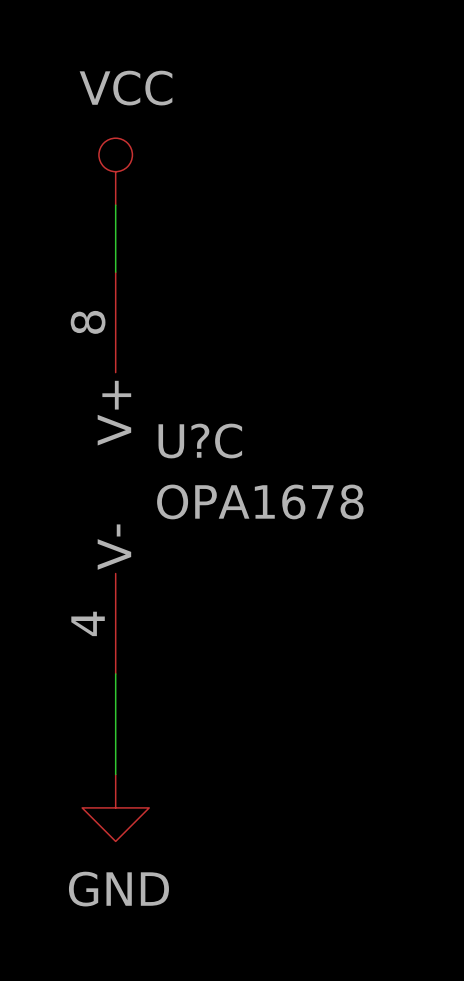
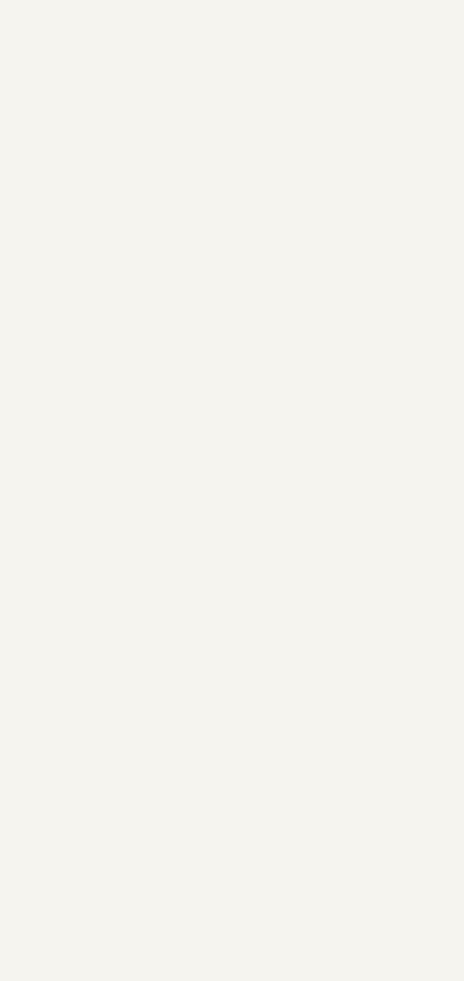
power symbol: VCC (115, 171) -> none
wire: (115, 205) (115, 272) -> none
U?C: OPA1678 (115, 473) -> none
wire: (115, 673) (115, 774) -> none
power symbol: GND (115, 807) -> none

